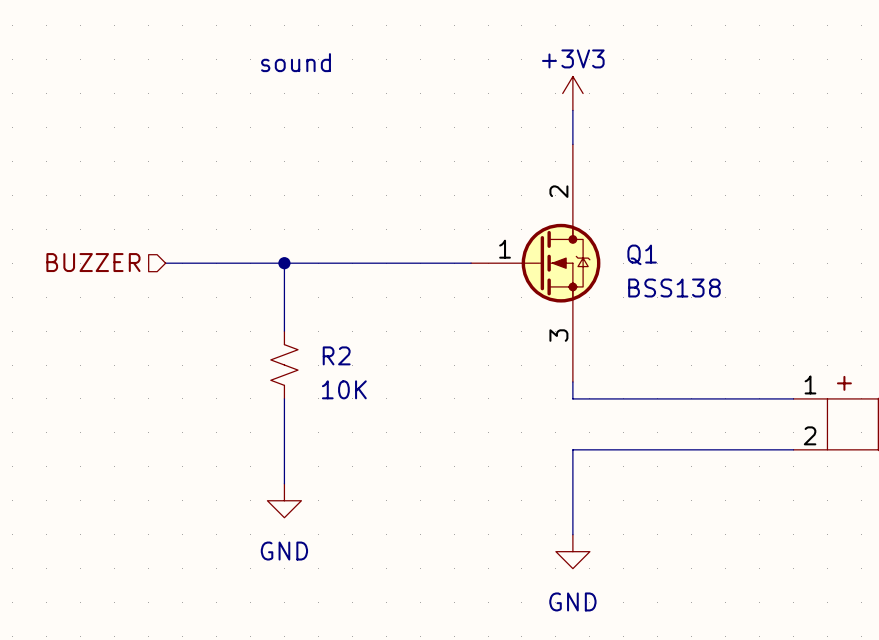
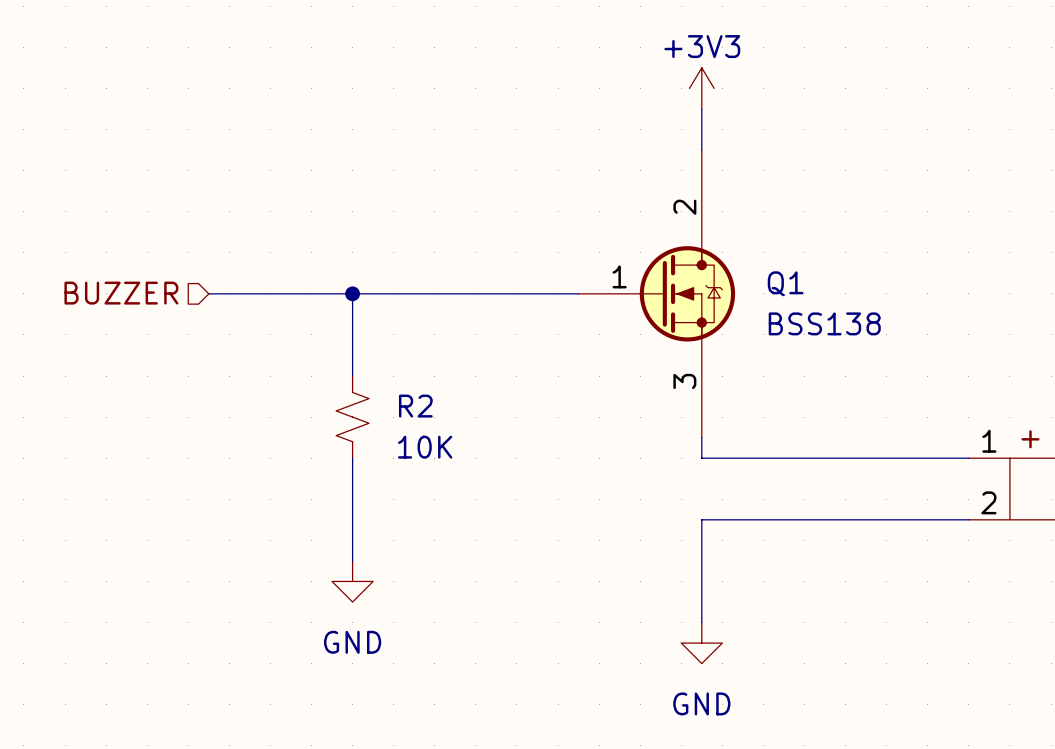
text: sound (296, 62) -> none

